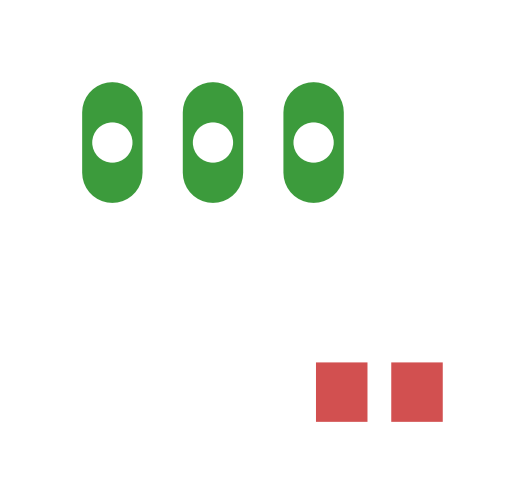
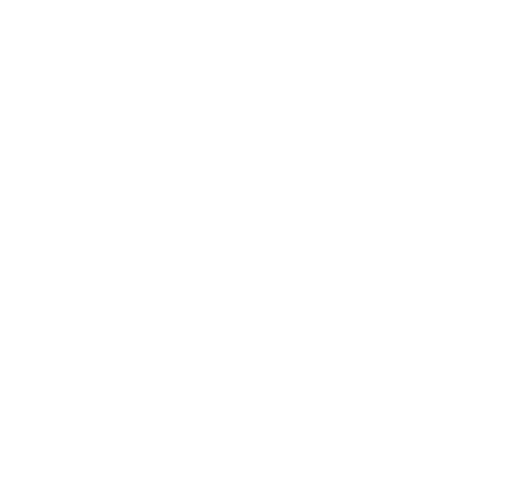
part: (212, 142) -> none
part: (379, 392) -> none

